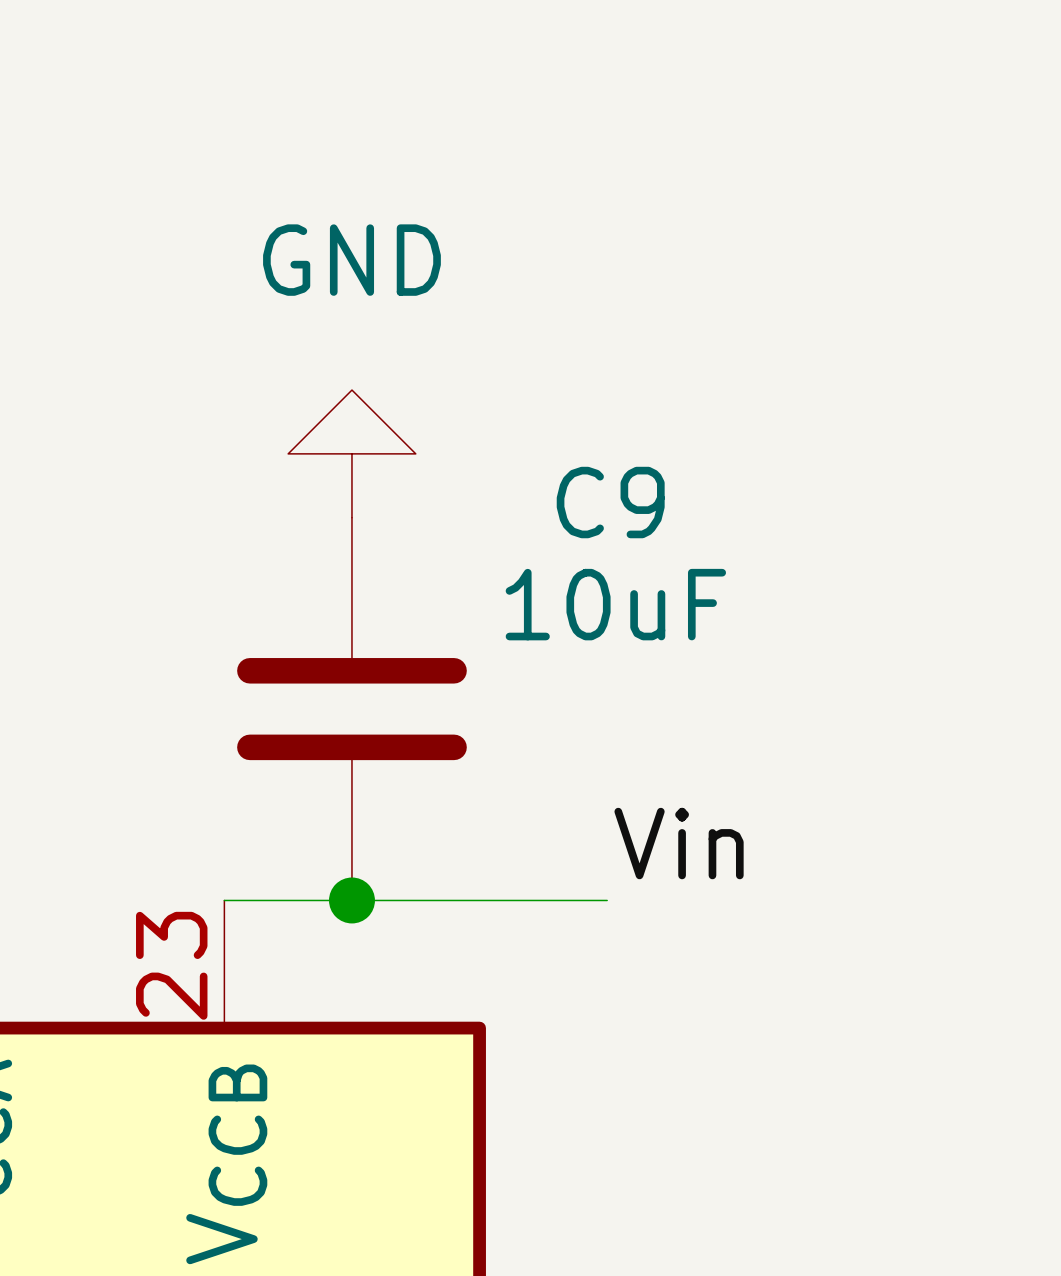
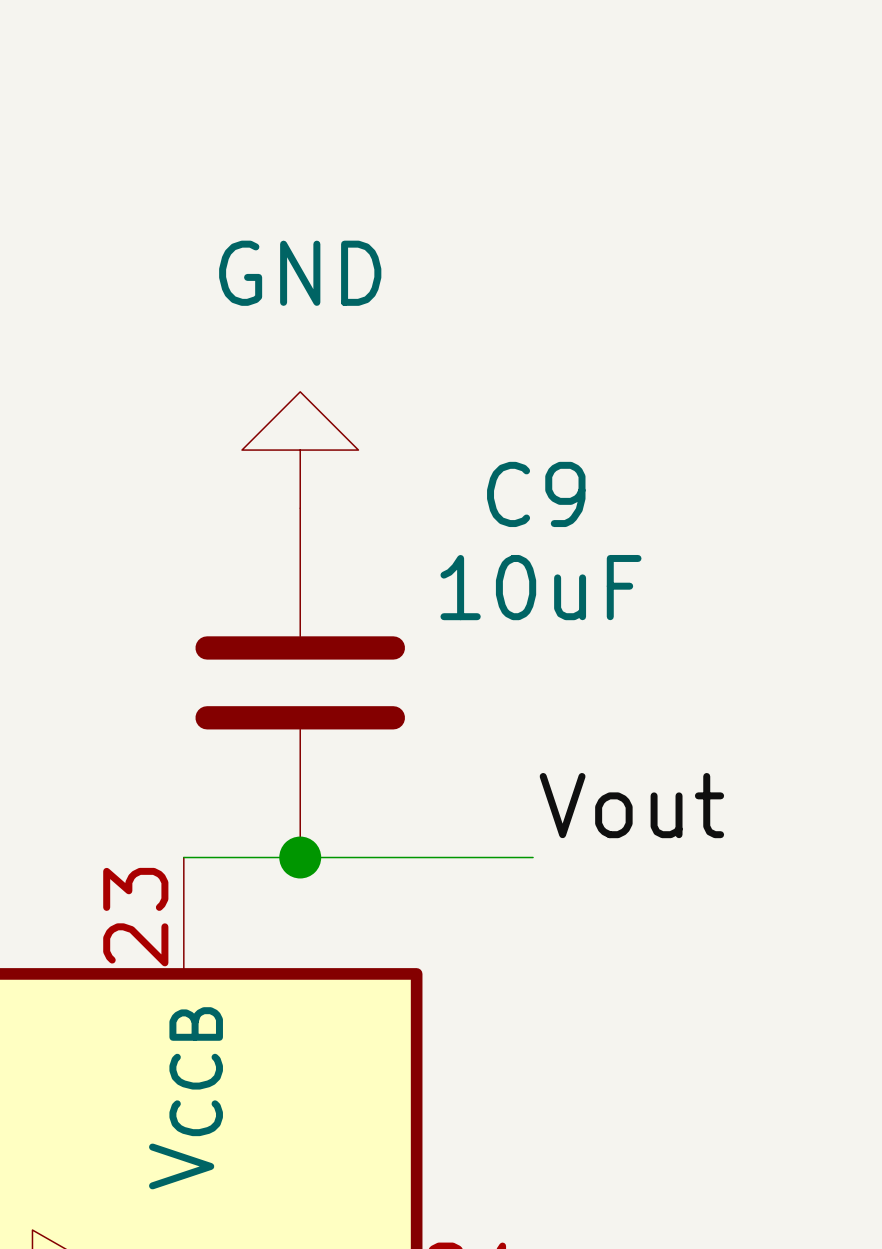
label: Vin (679, 843) -> Vout (631, 805)

